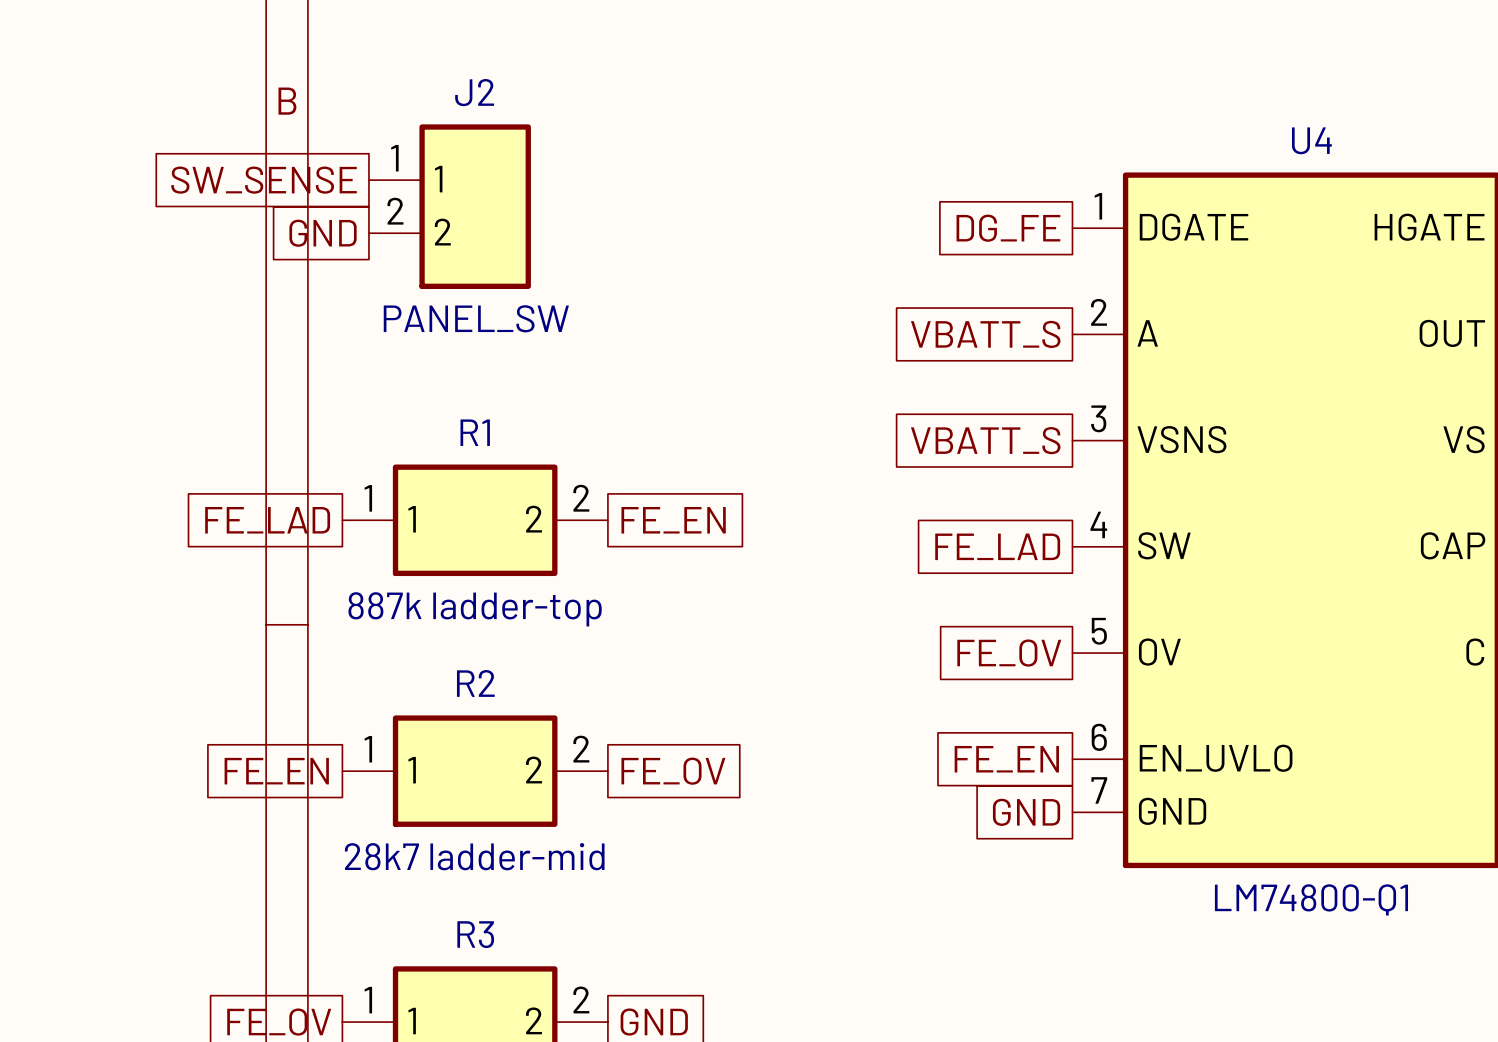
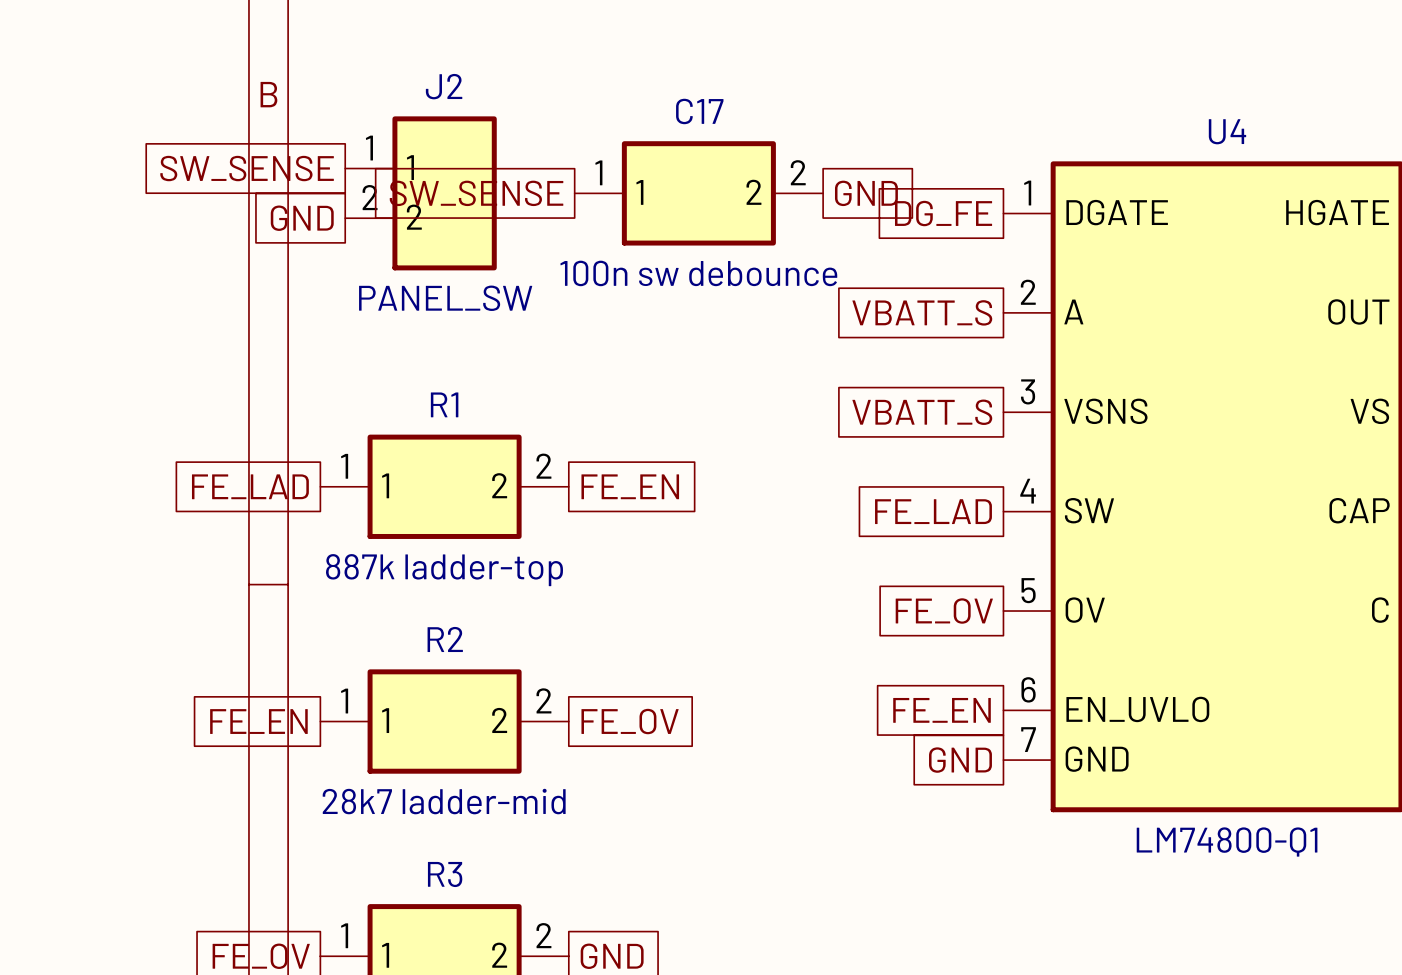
global label: none -> SW_SENSE (476, 193)
C17: none -> 100n sw debounce (698, 193)
global label: none -> GND (866, 193)

